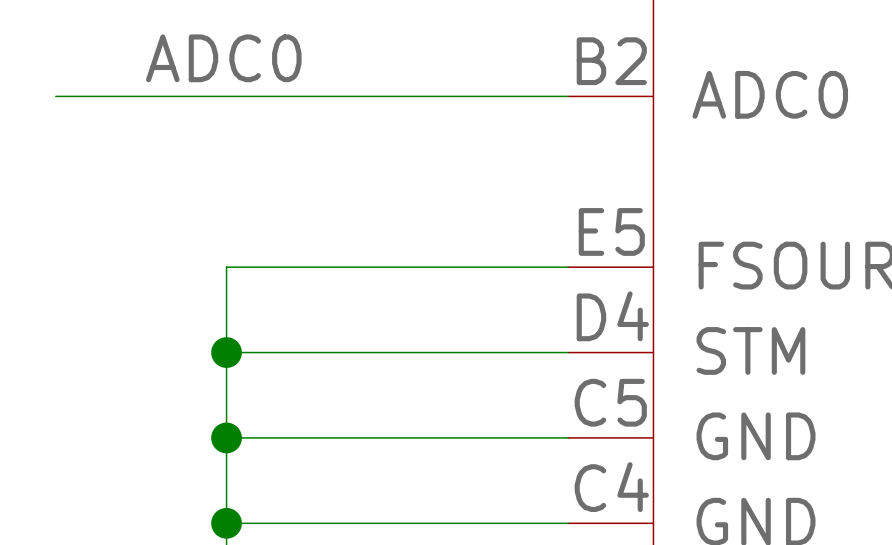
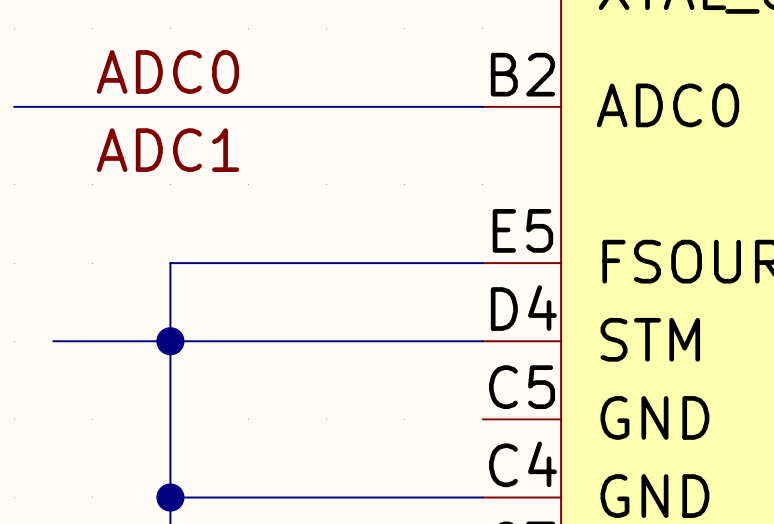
label: none -> ADC1 (167, 150)
wire: none -> (53, 341) (170, 341)
wire: (226, 437) (568, 437) -> none
junction: (226, 437) -> none

